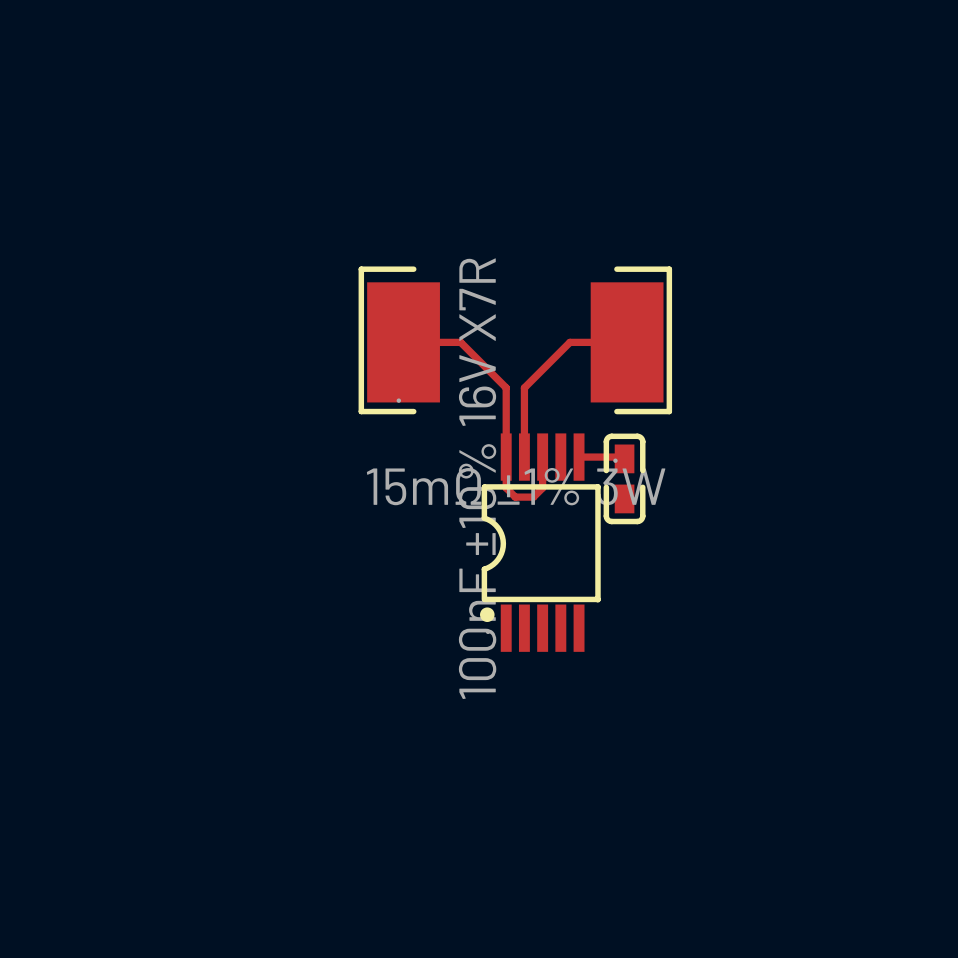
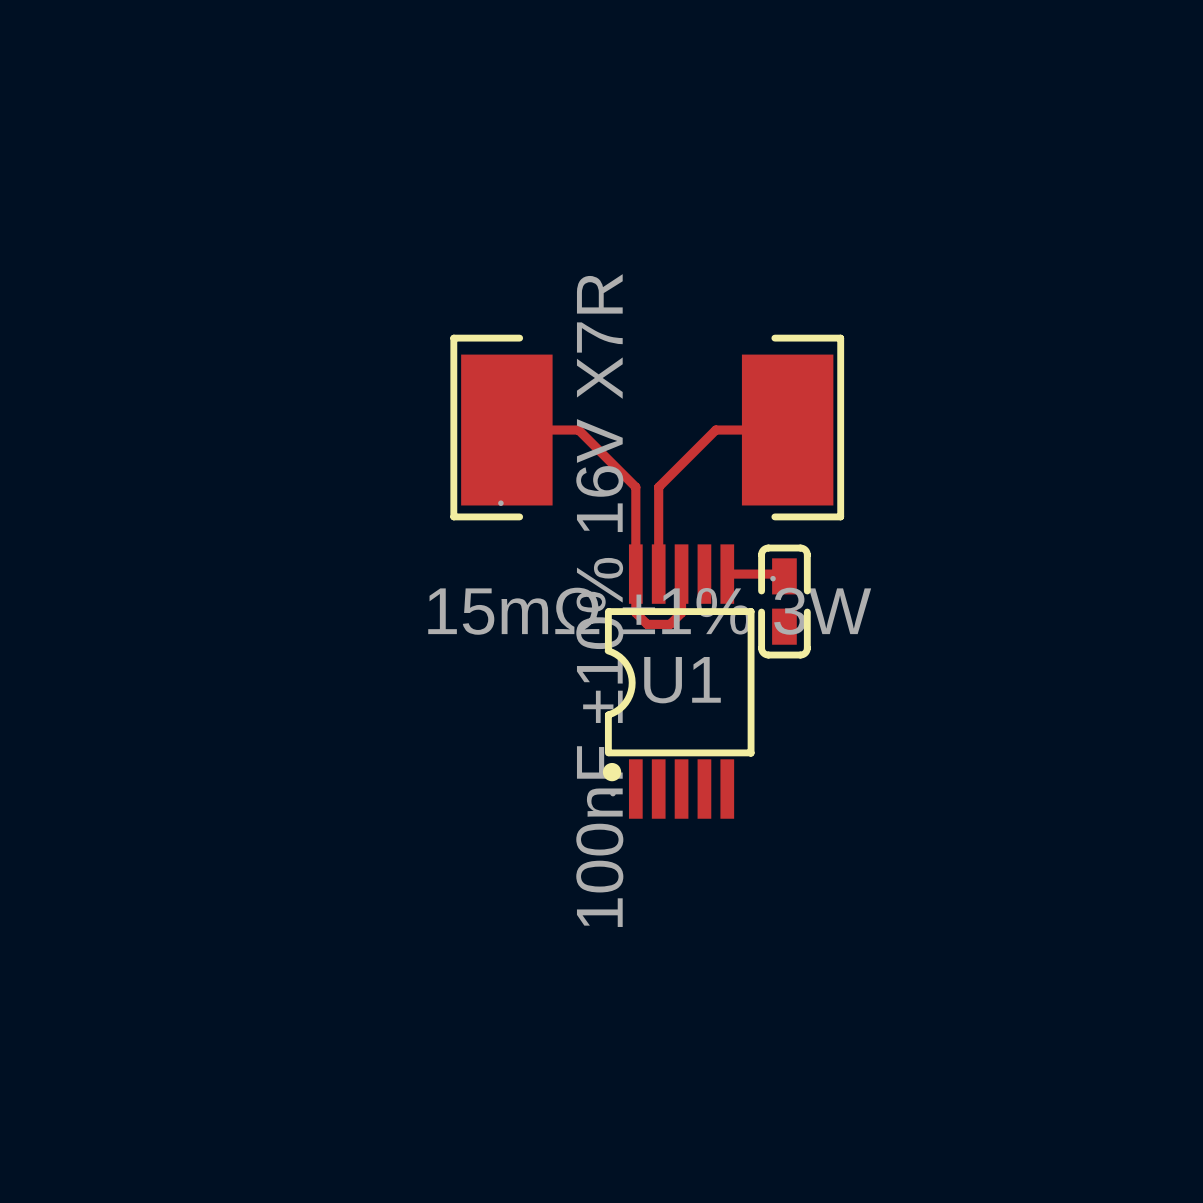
U1 name: none -> U1 (682, 680)

